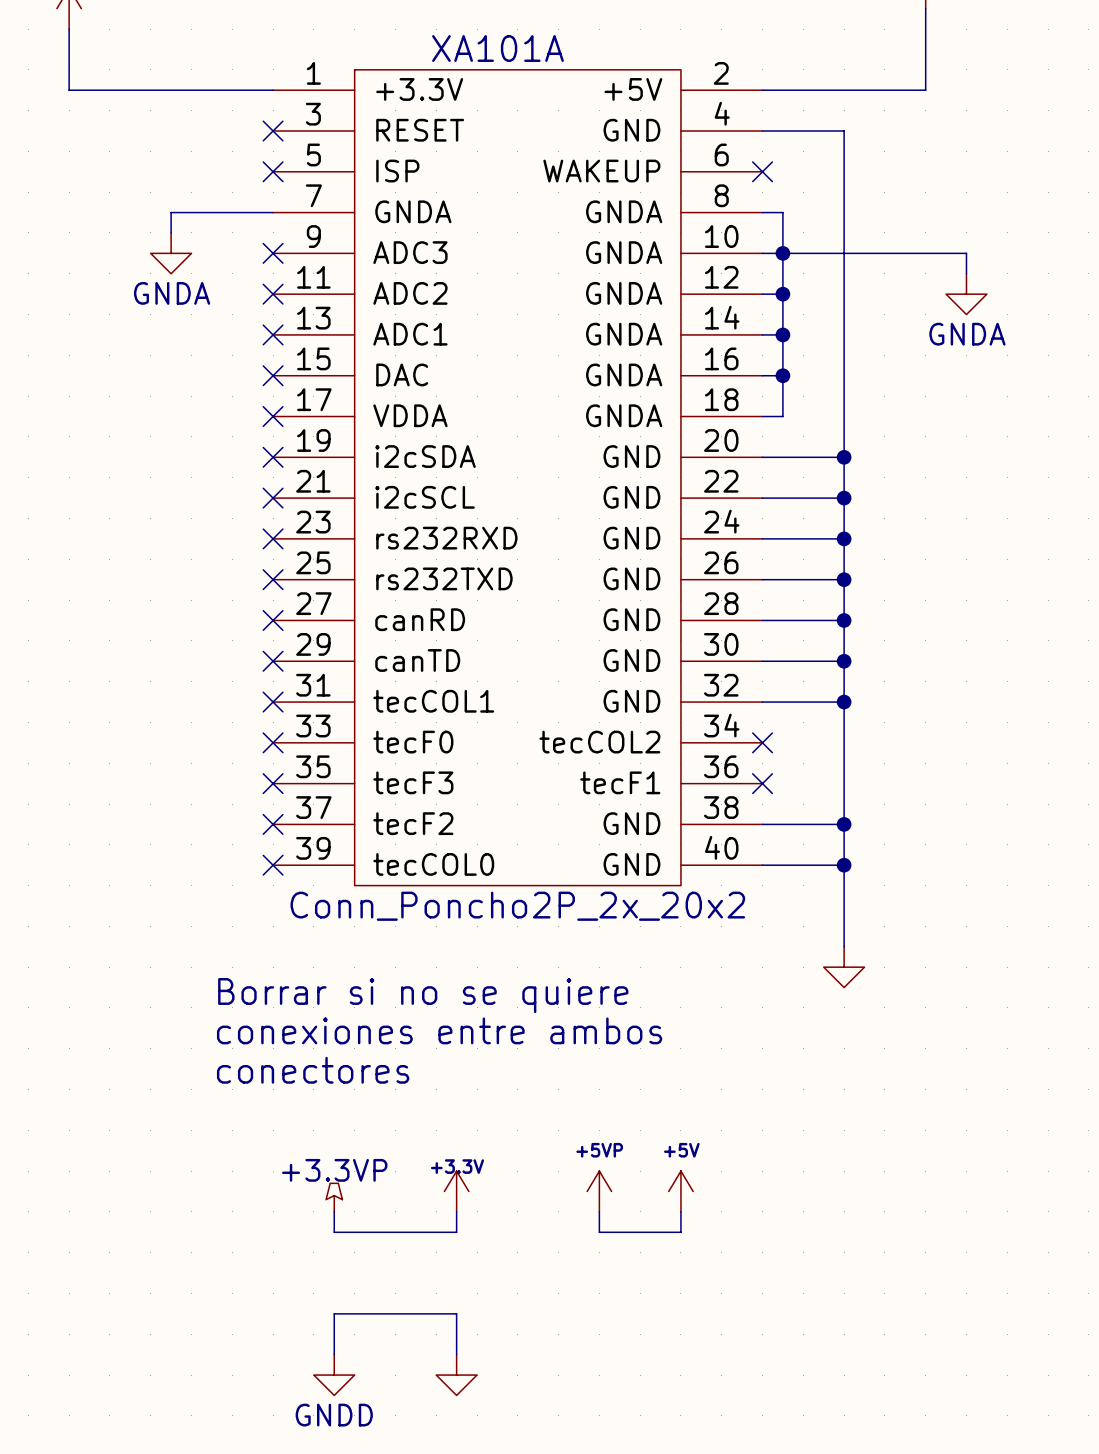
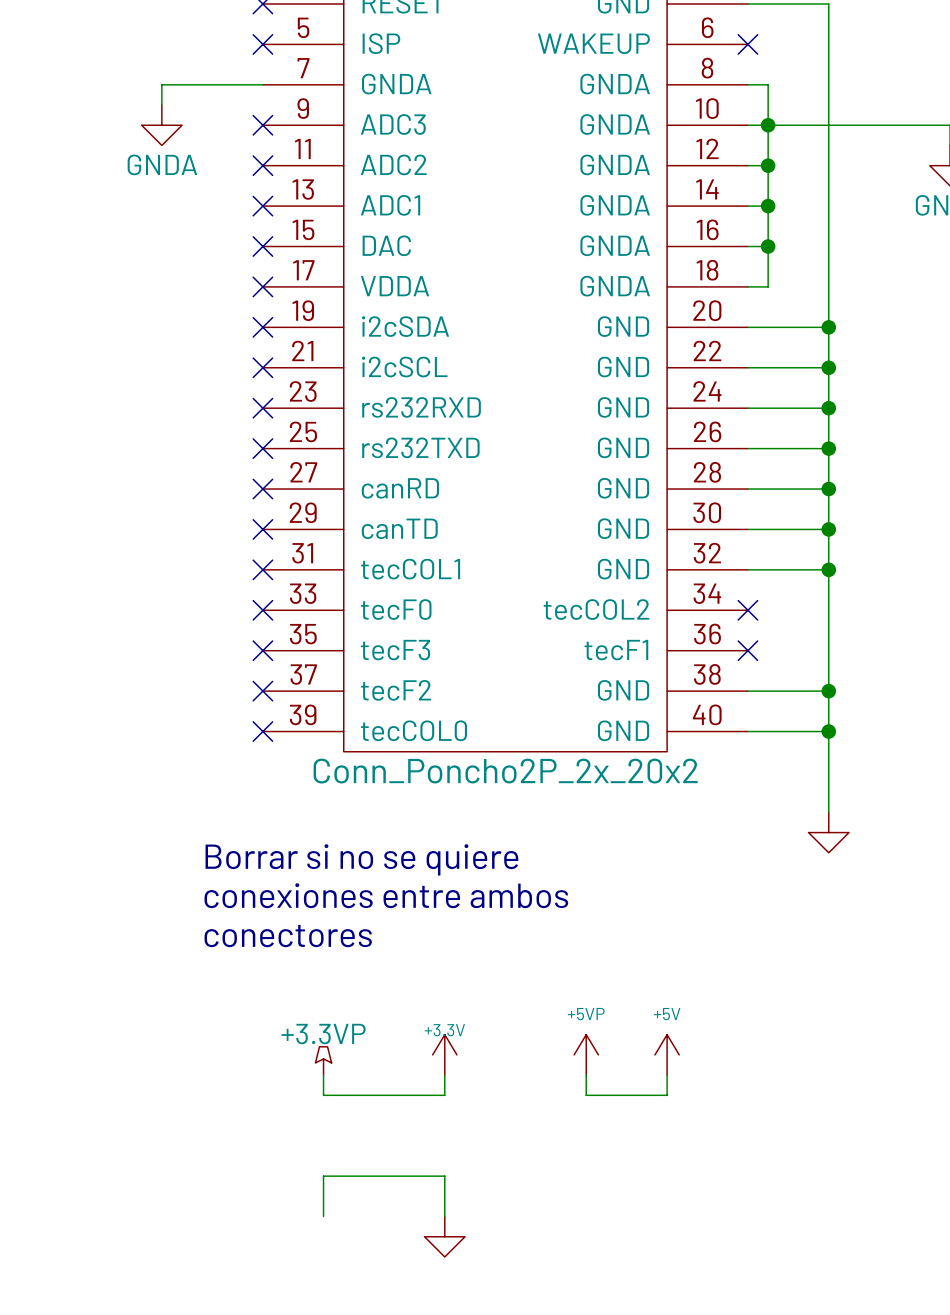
power symbol: GNDD (334, 1375) -> none

